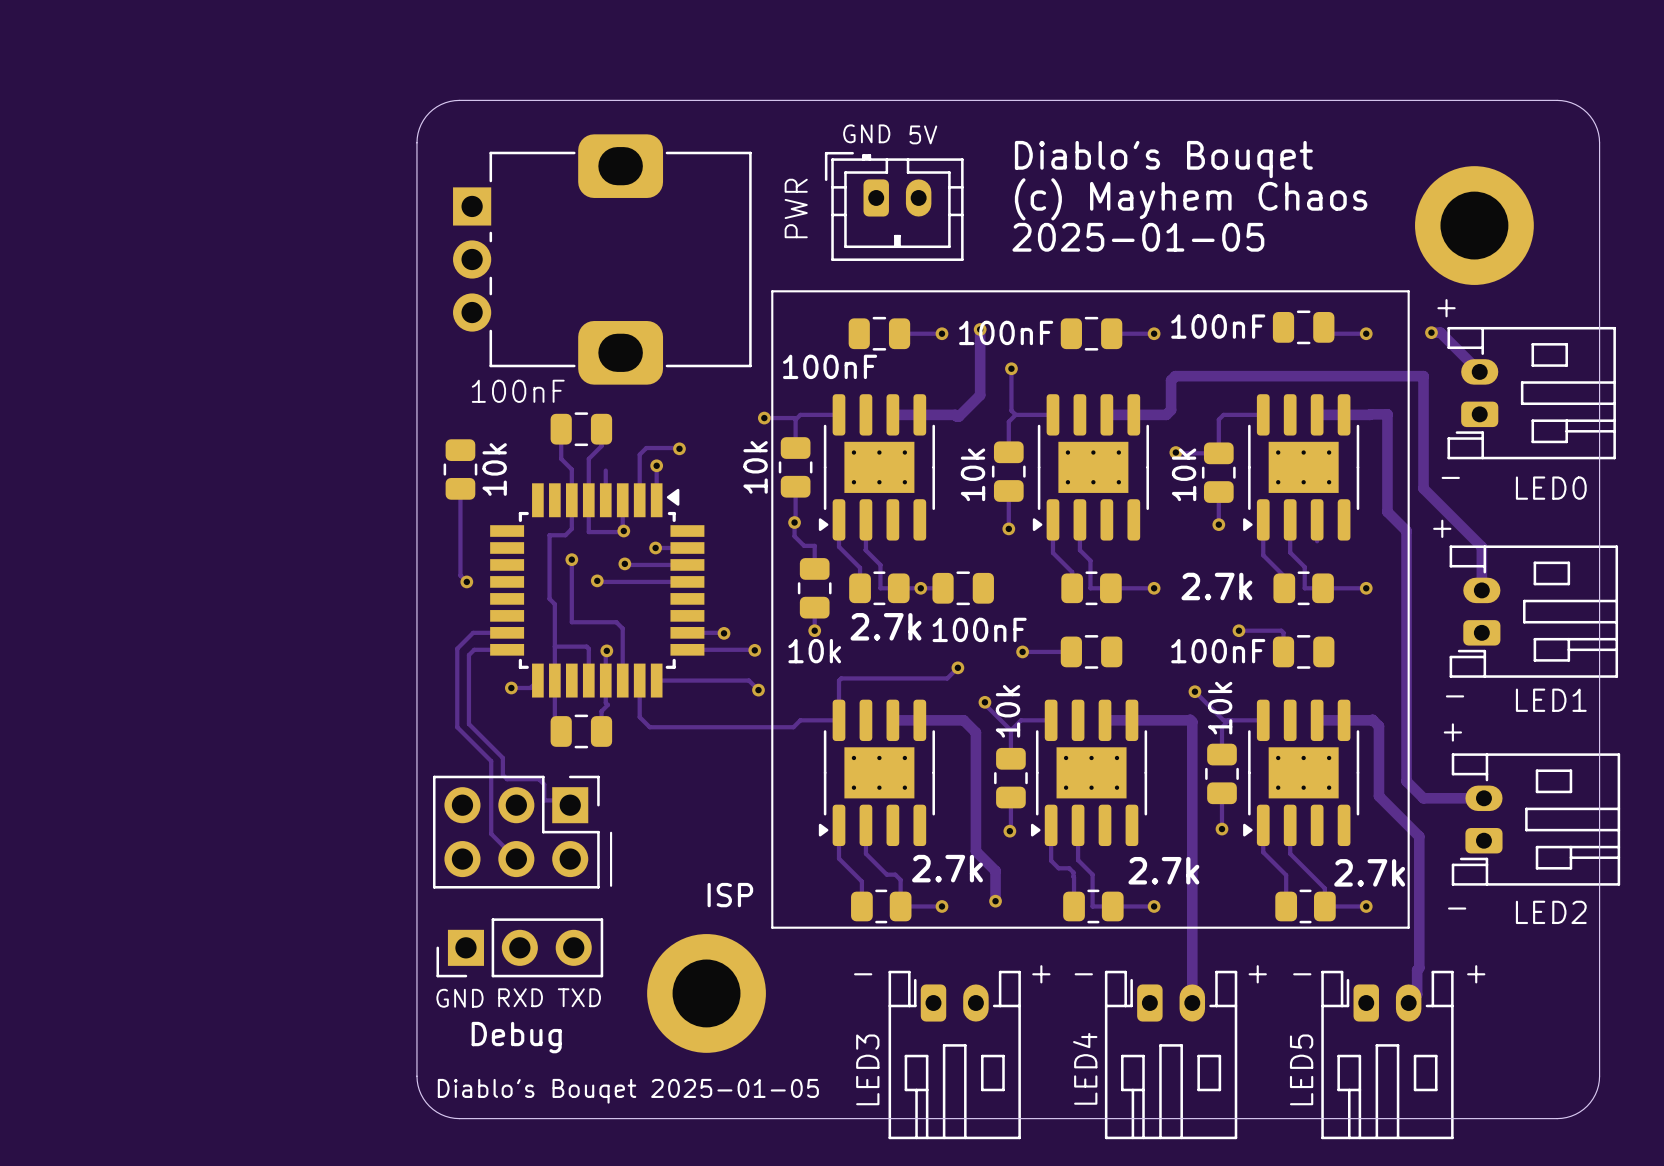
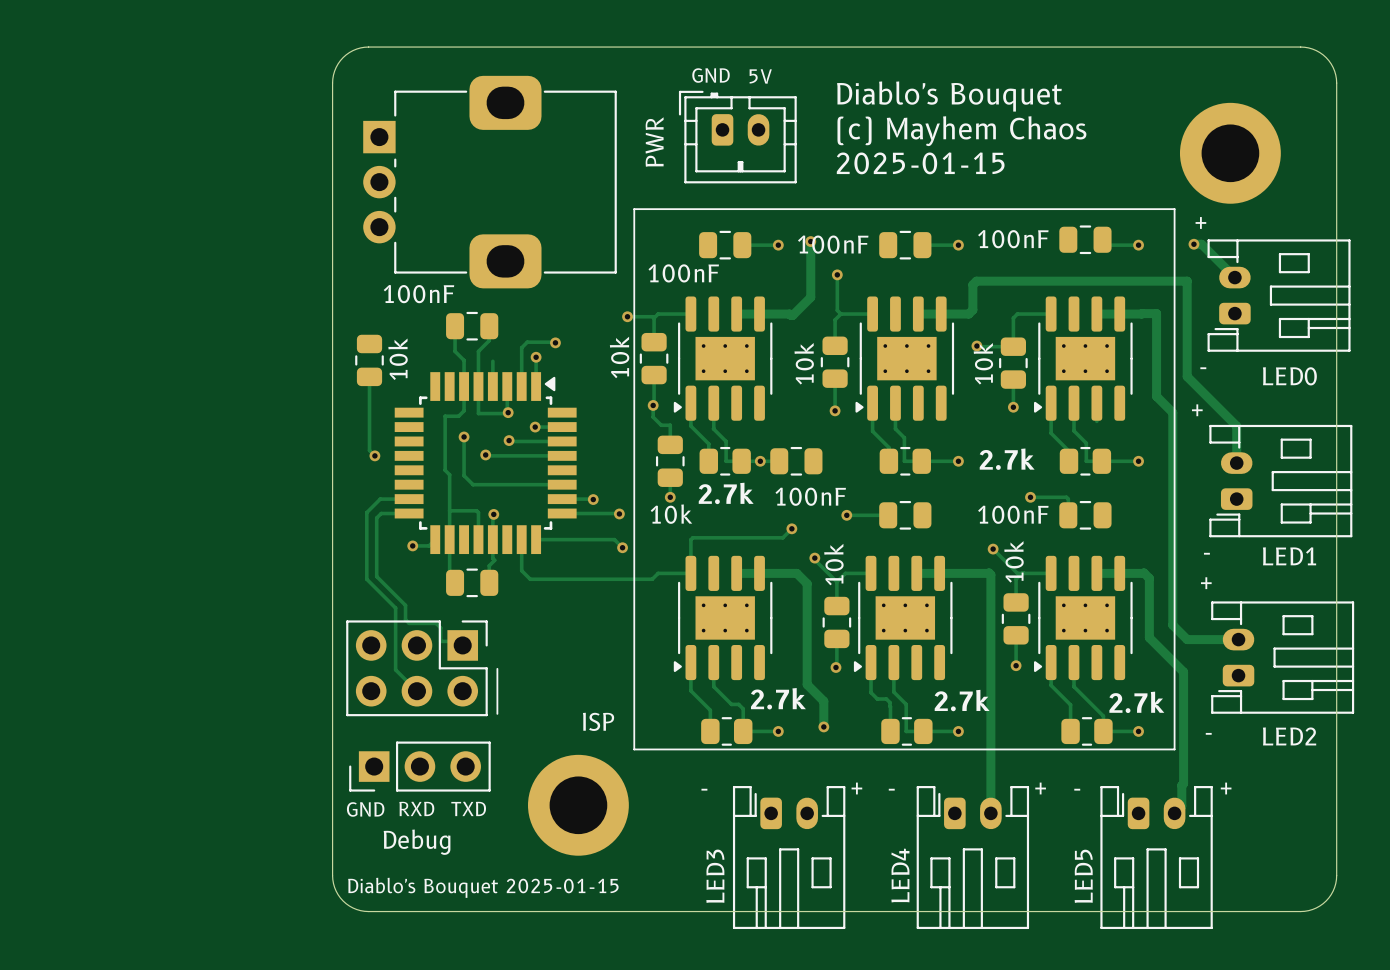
text: Diablo's Bouqet (1163, 159) -> Diablo's Bouquet (949, 96)
text: 2025-01-05 (1138, 237) -> 2025-01-15 (920, 163)
track: (571, 605) (571, 622) (616, 622) (622, 628) (622, 680) -> (464, 475) (473, 484) (562, 484)
text: Diablo's Bouqet 2025-01-05 (628, 1091) -> Diablo's Bouquet 2025-01-15 (483, 887)

